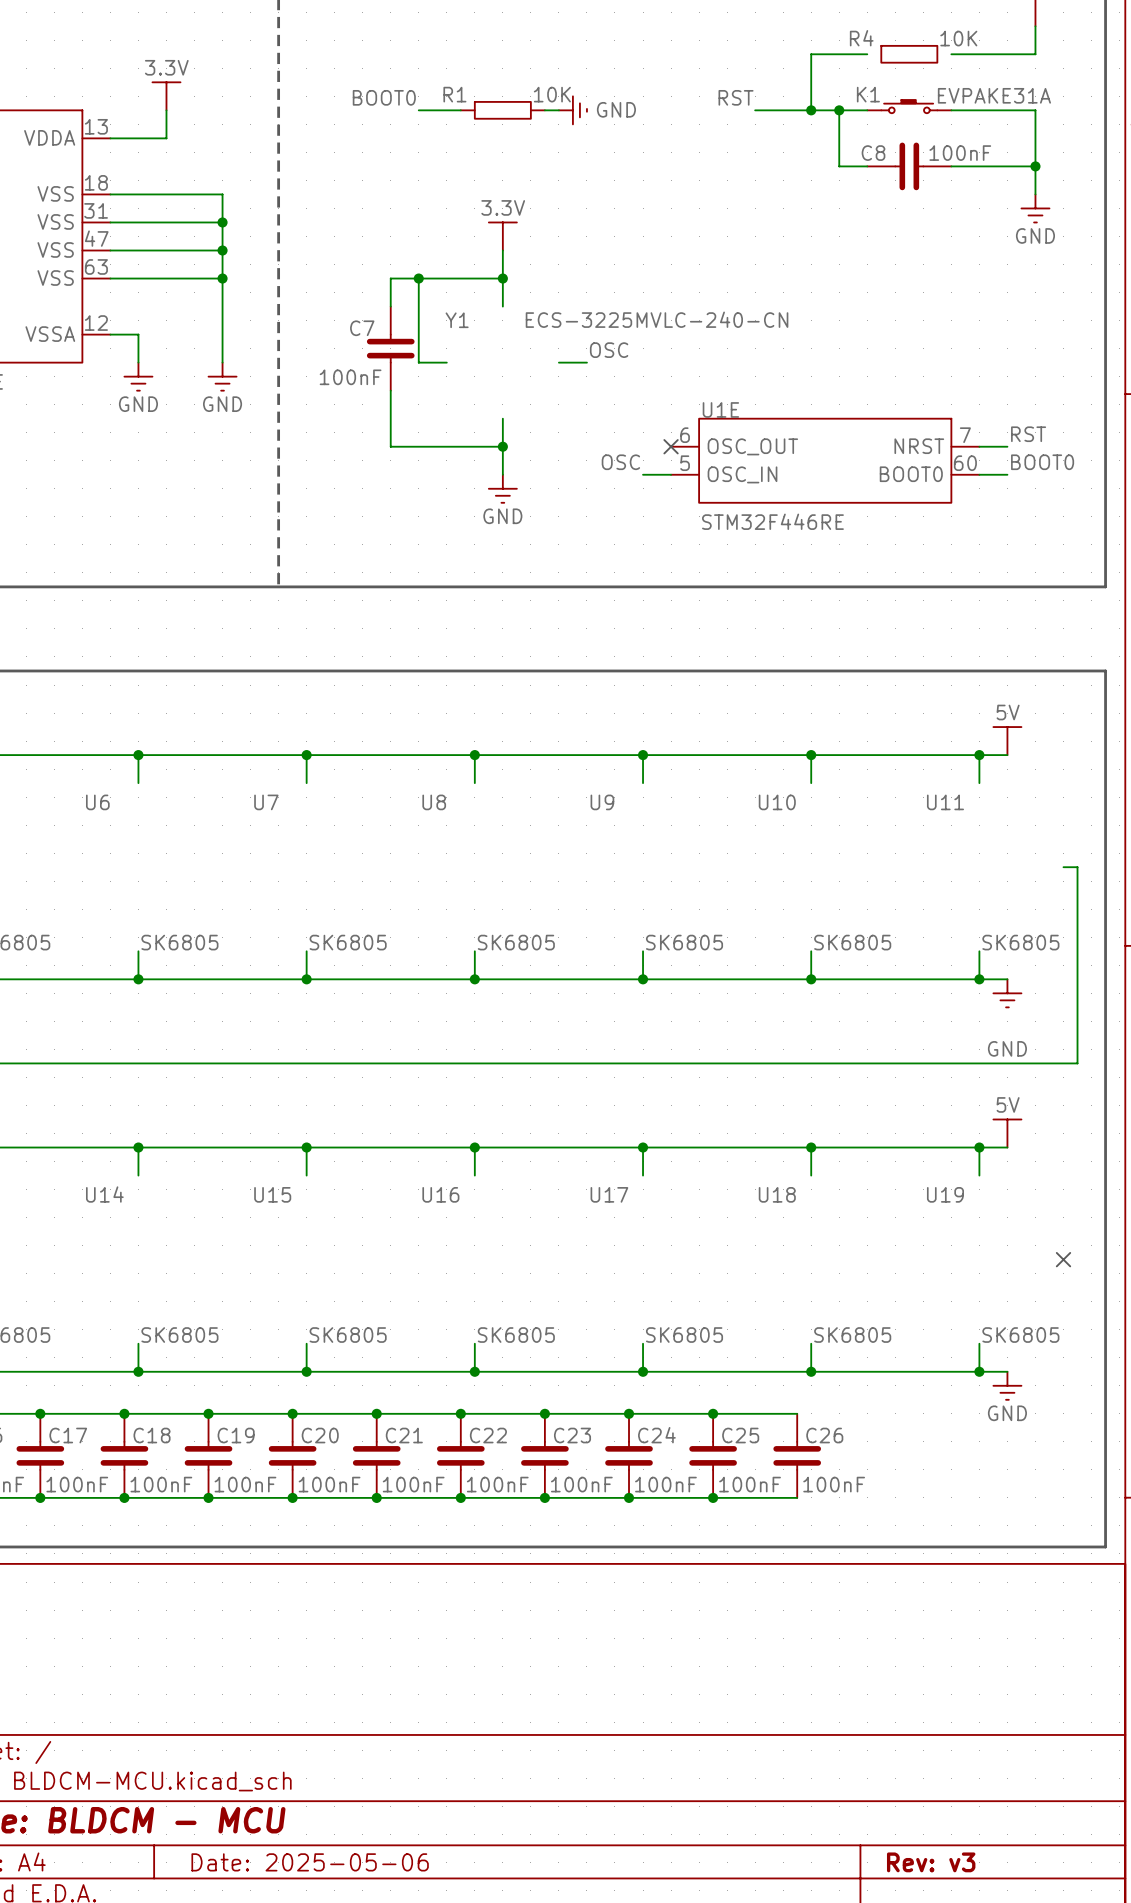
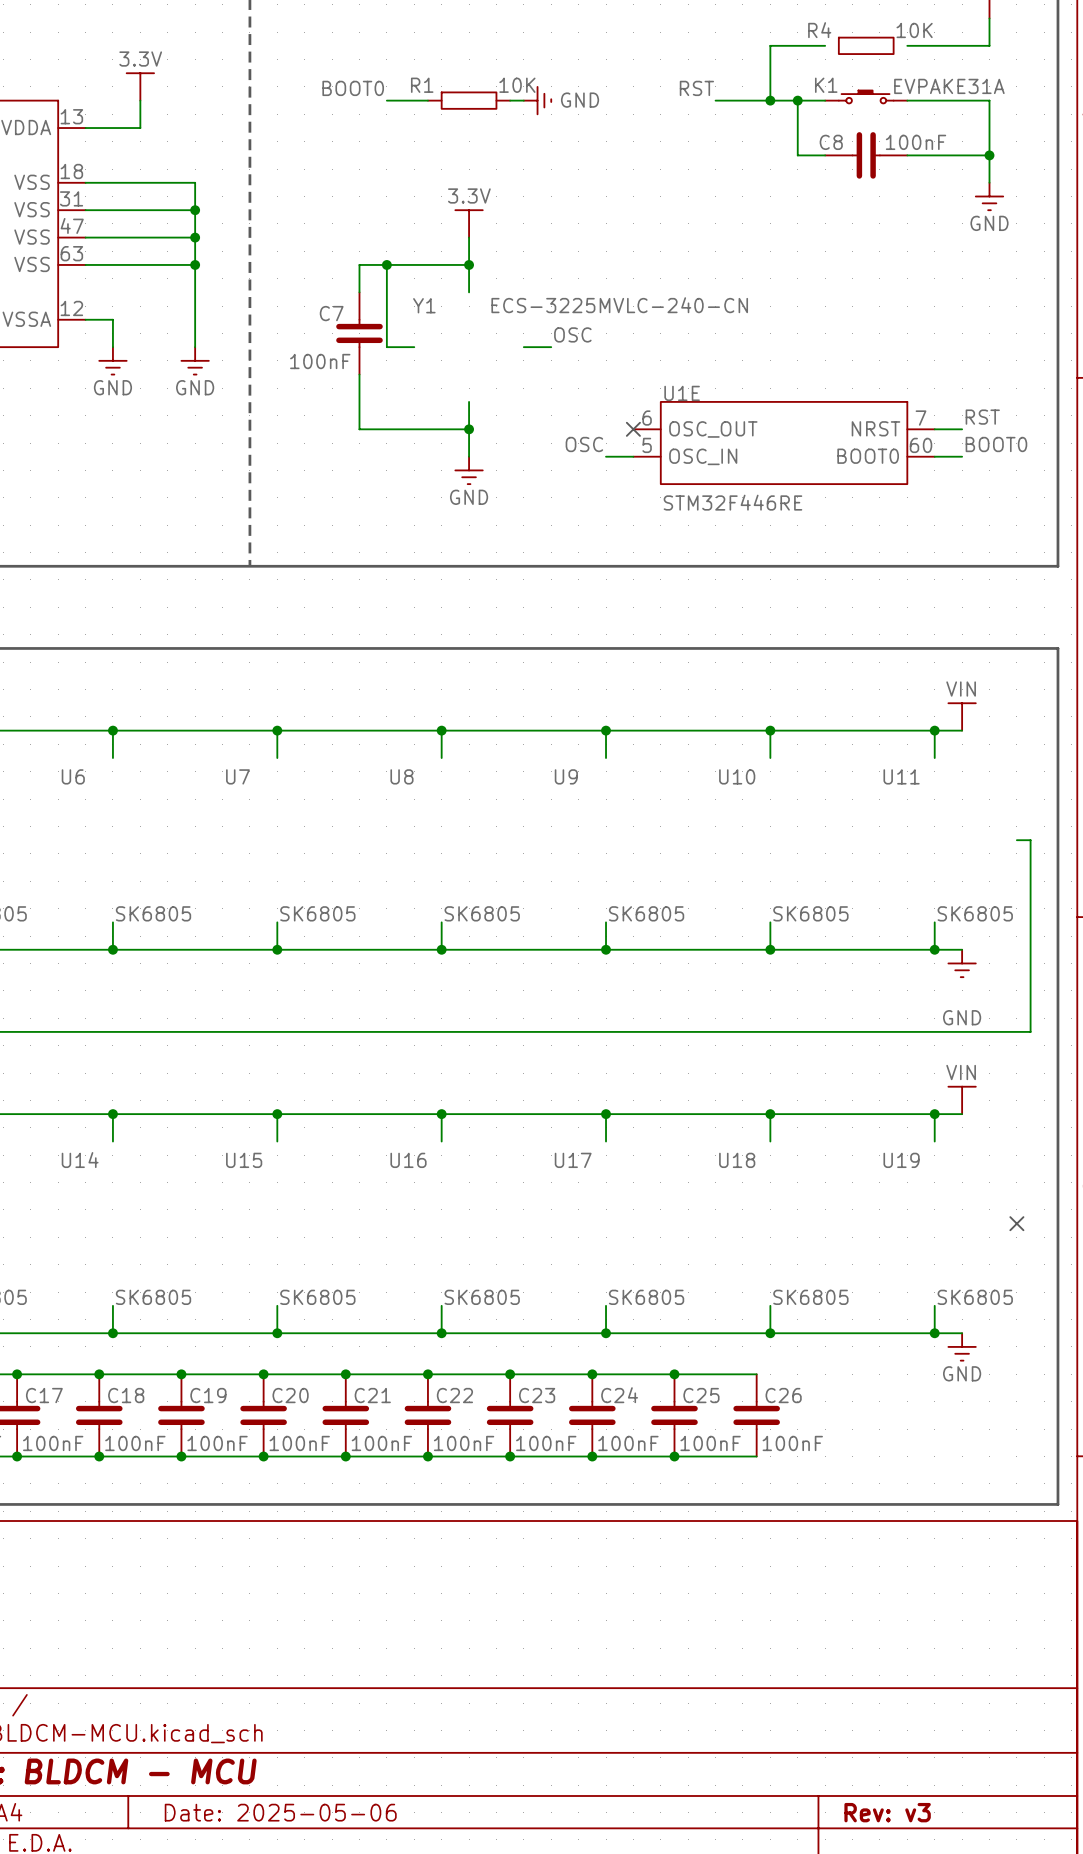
power symbol: 5V (1007, 741) -> VIN (962, 716)
power symbol: 5V (1007, 1133) -> VIN (962, 1100)

